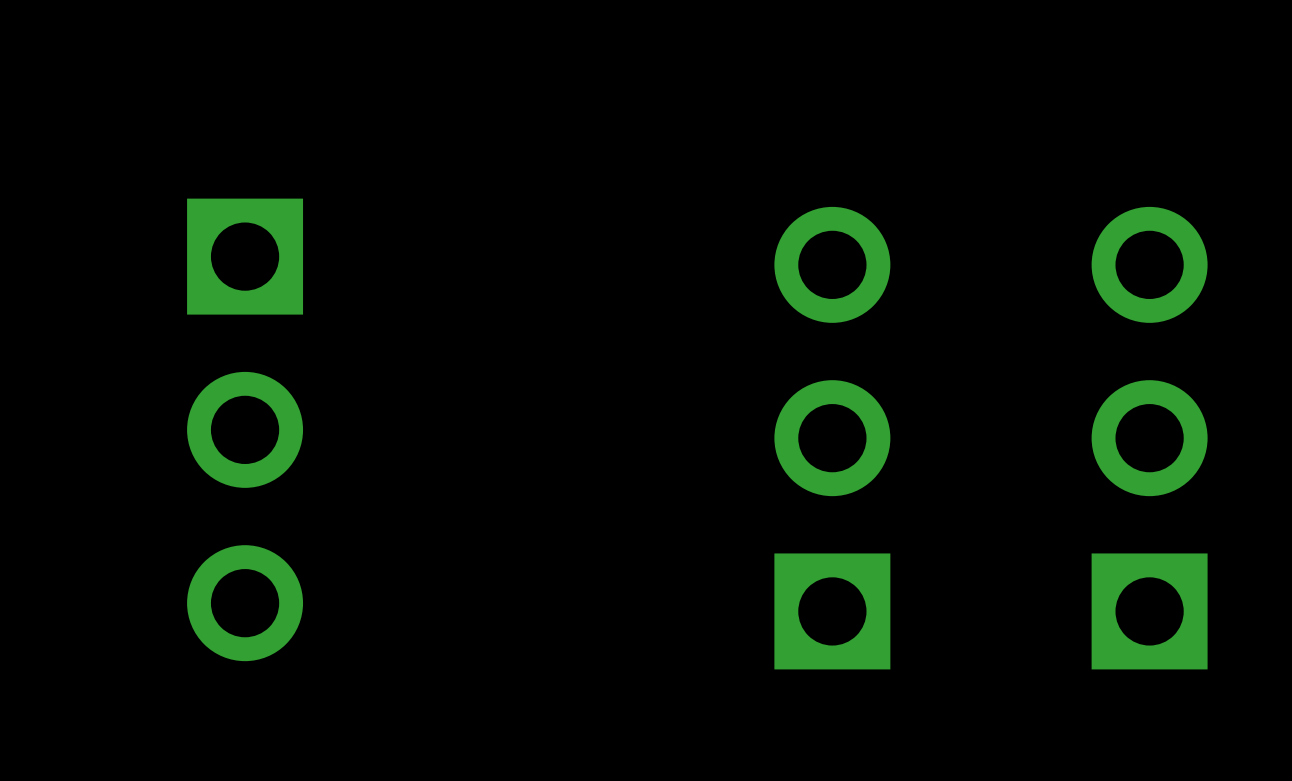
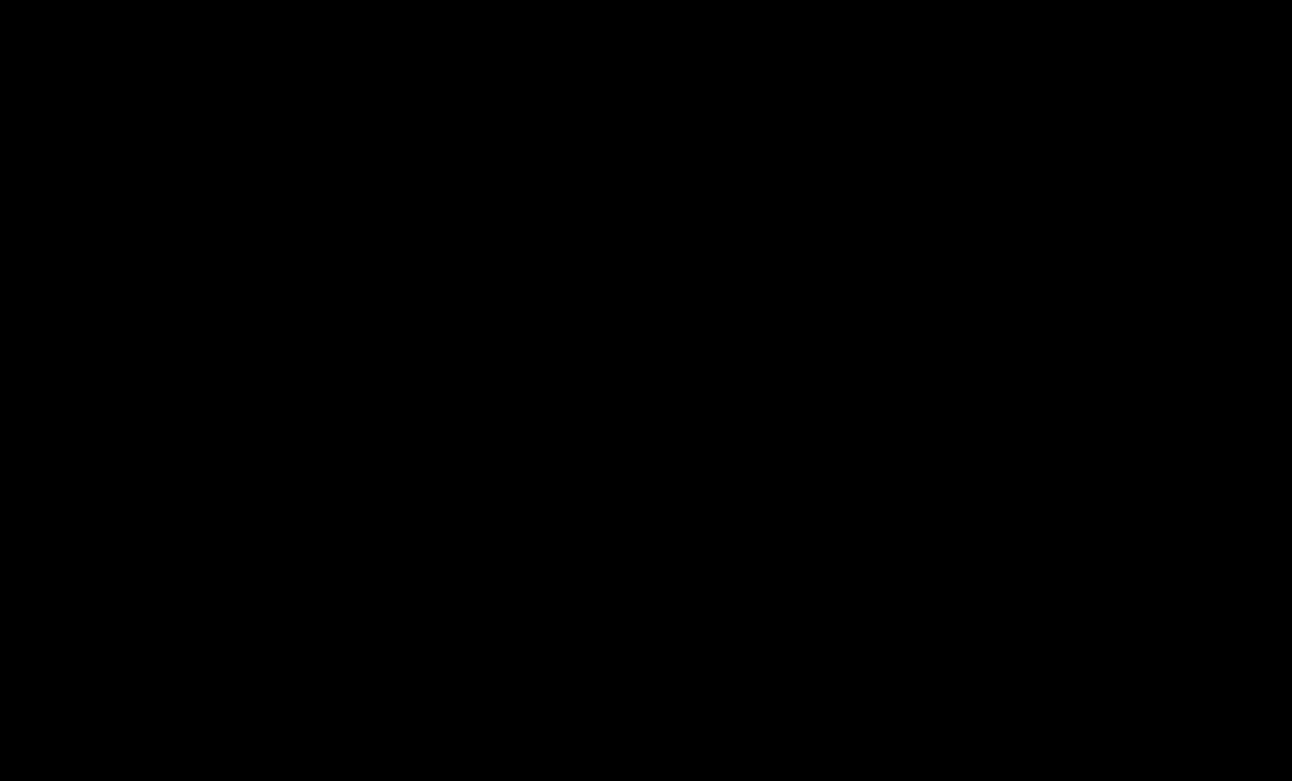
part: (245, 429) -> none
part: (832, 438) -> none
part: (1149, 438) -> none

